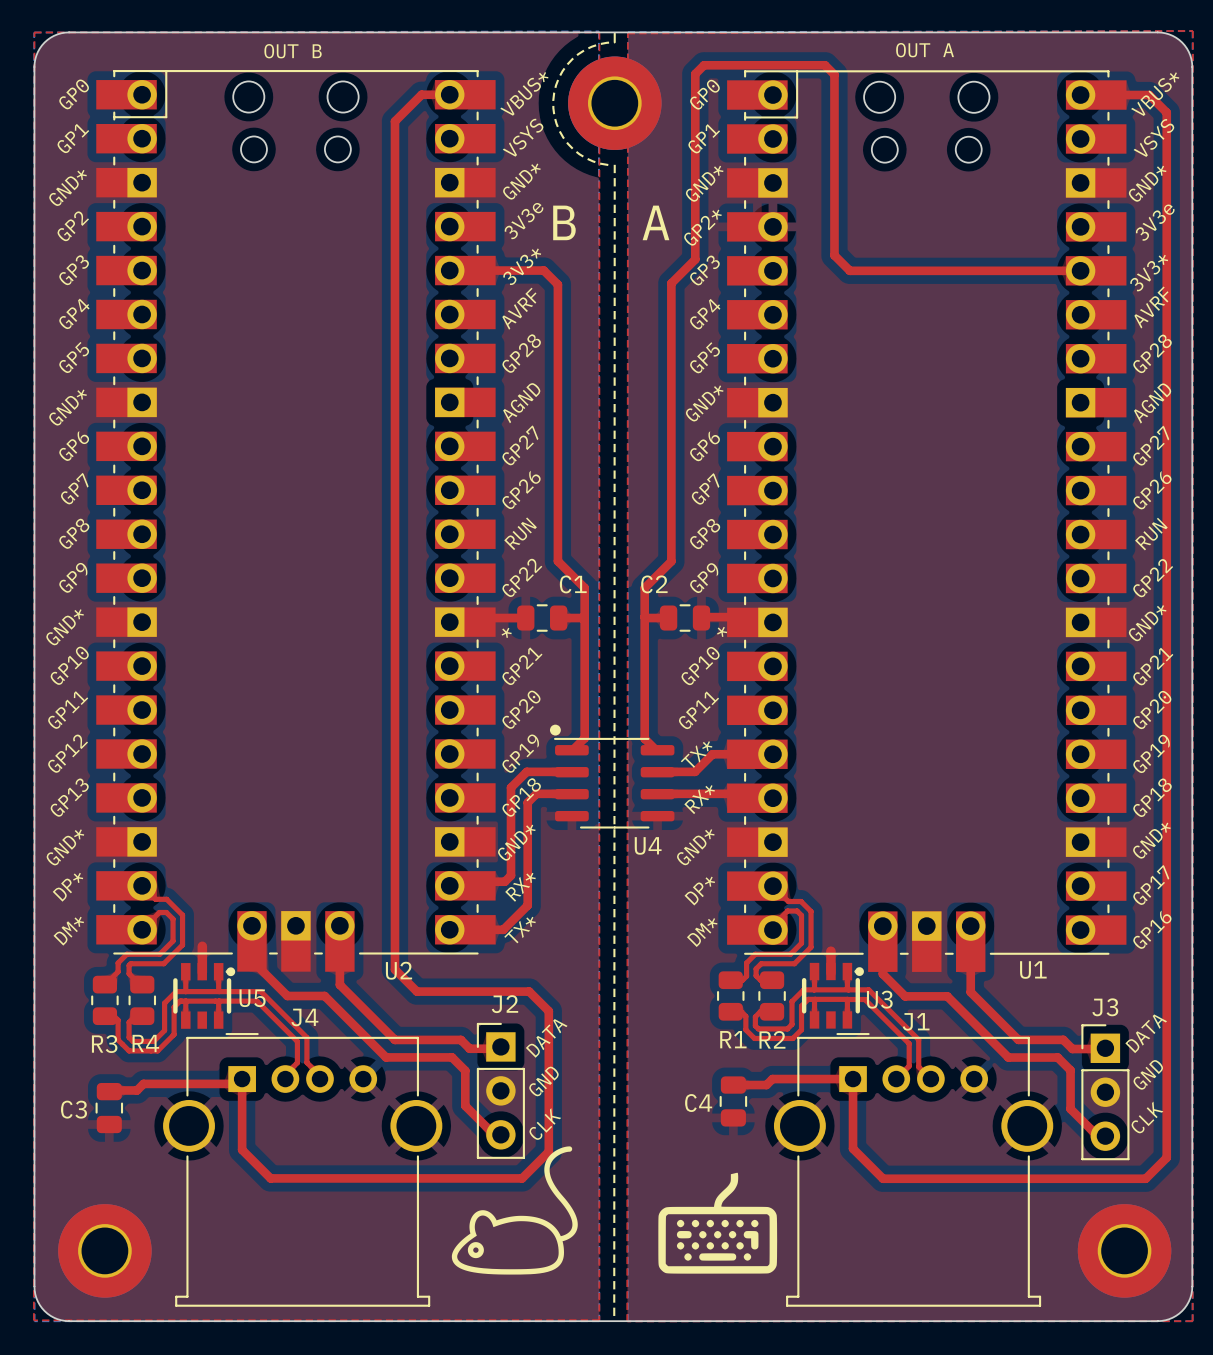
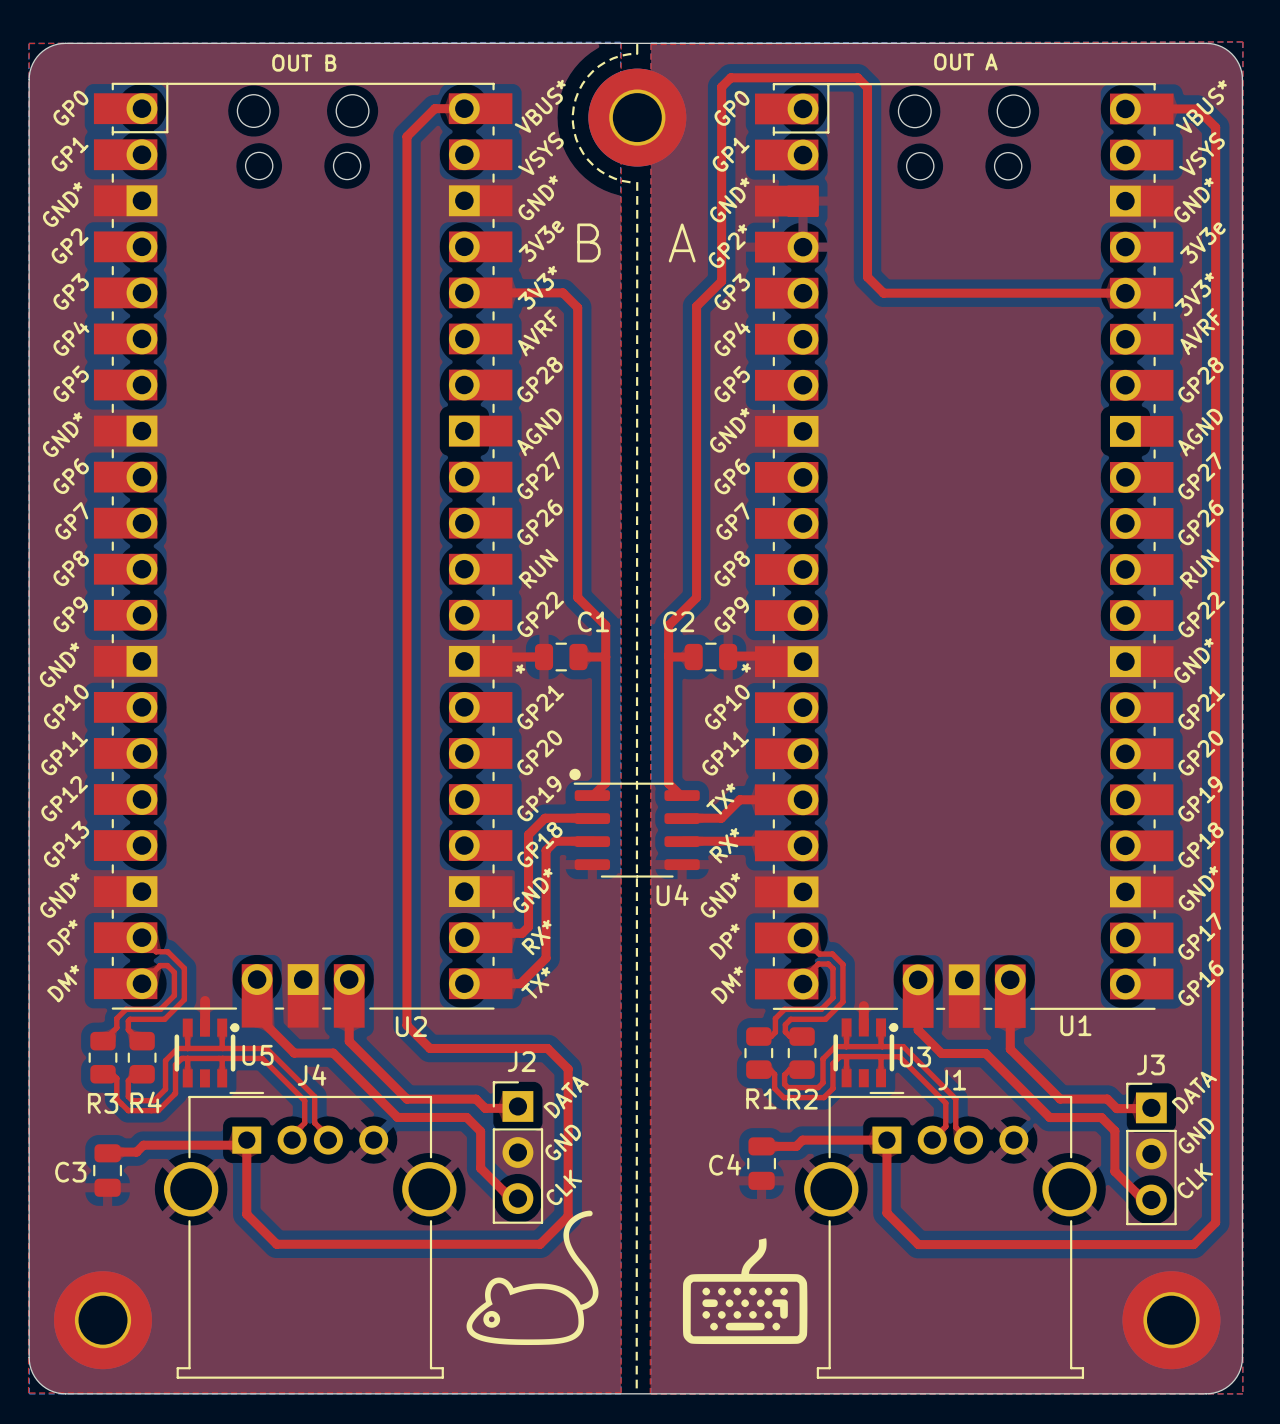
U1 footprint: [727, 70, 1127, 972] -> [754, 83, 1174, 1028]

